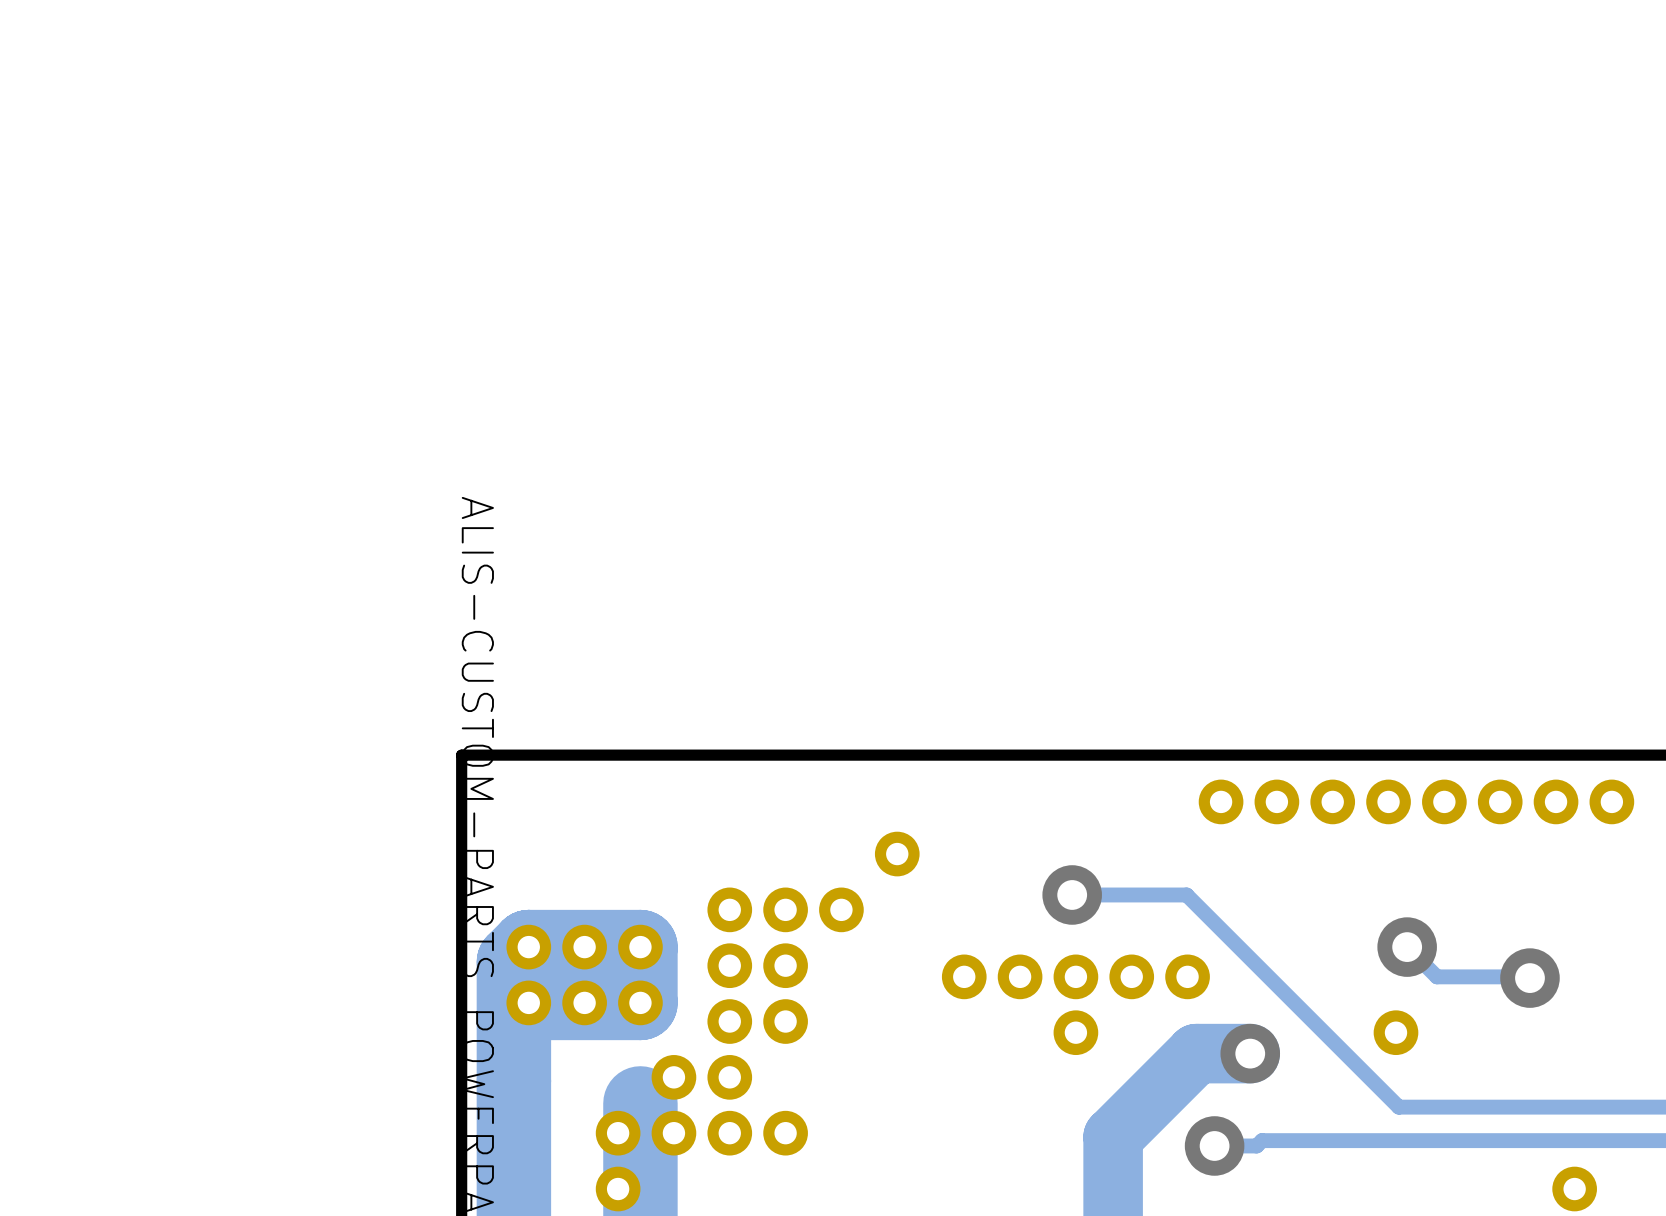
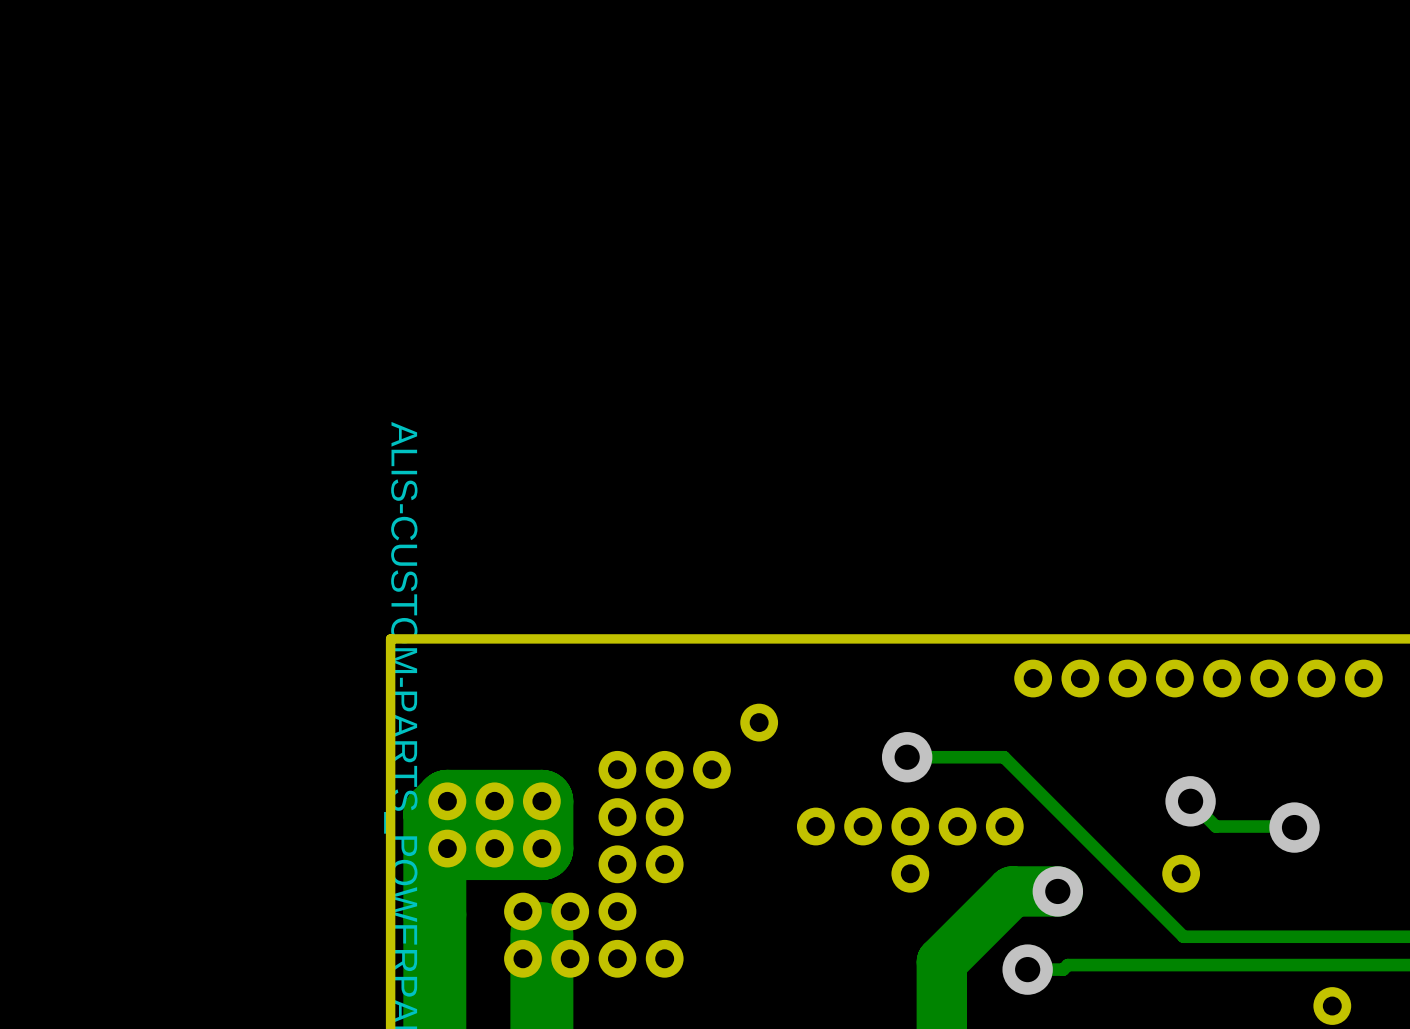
part: none -> (522, 911)
part: (618, 1189) -> none

